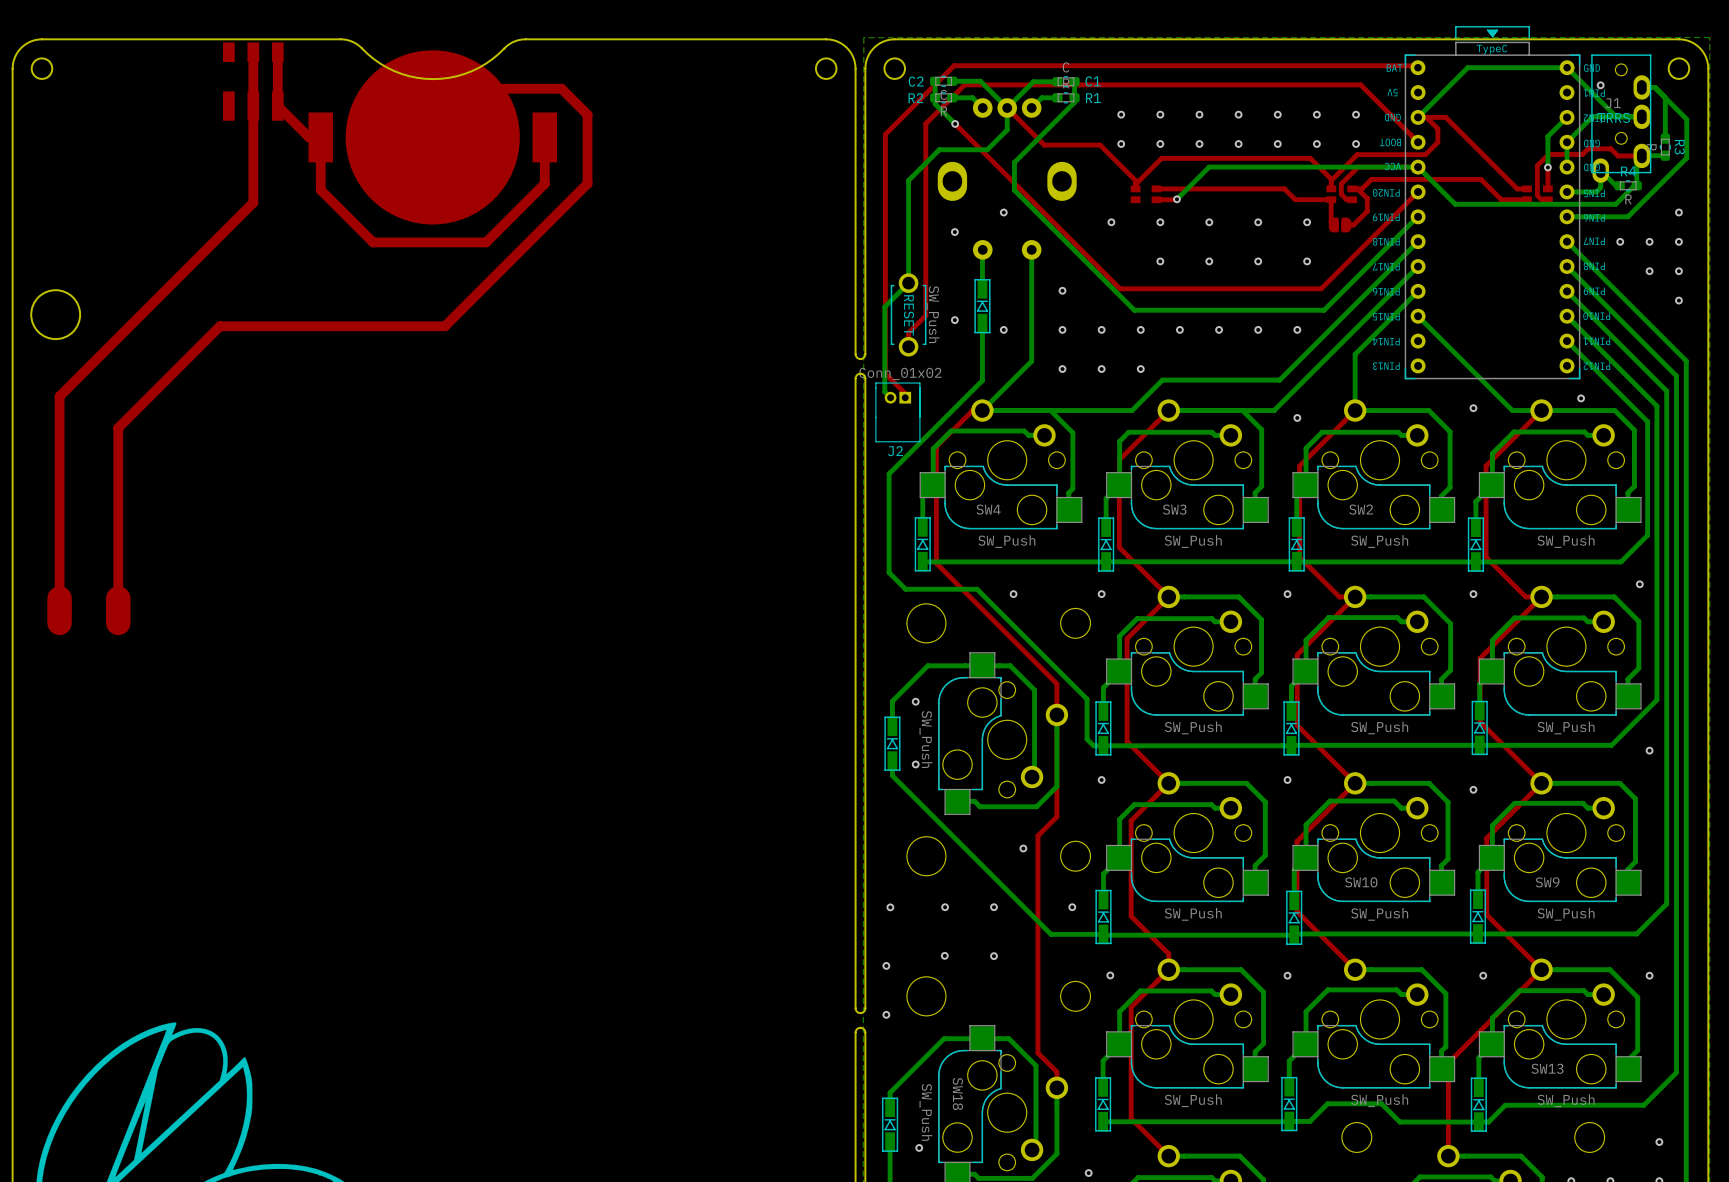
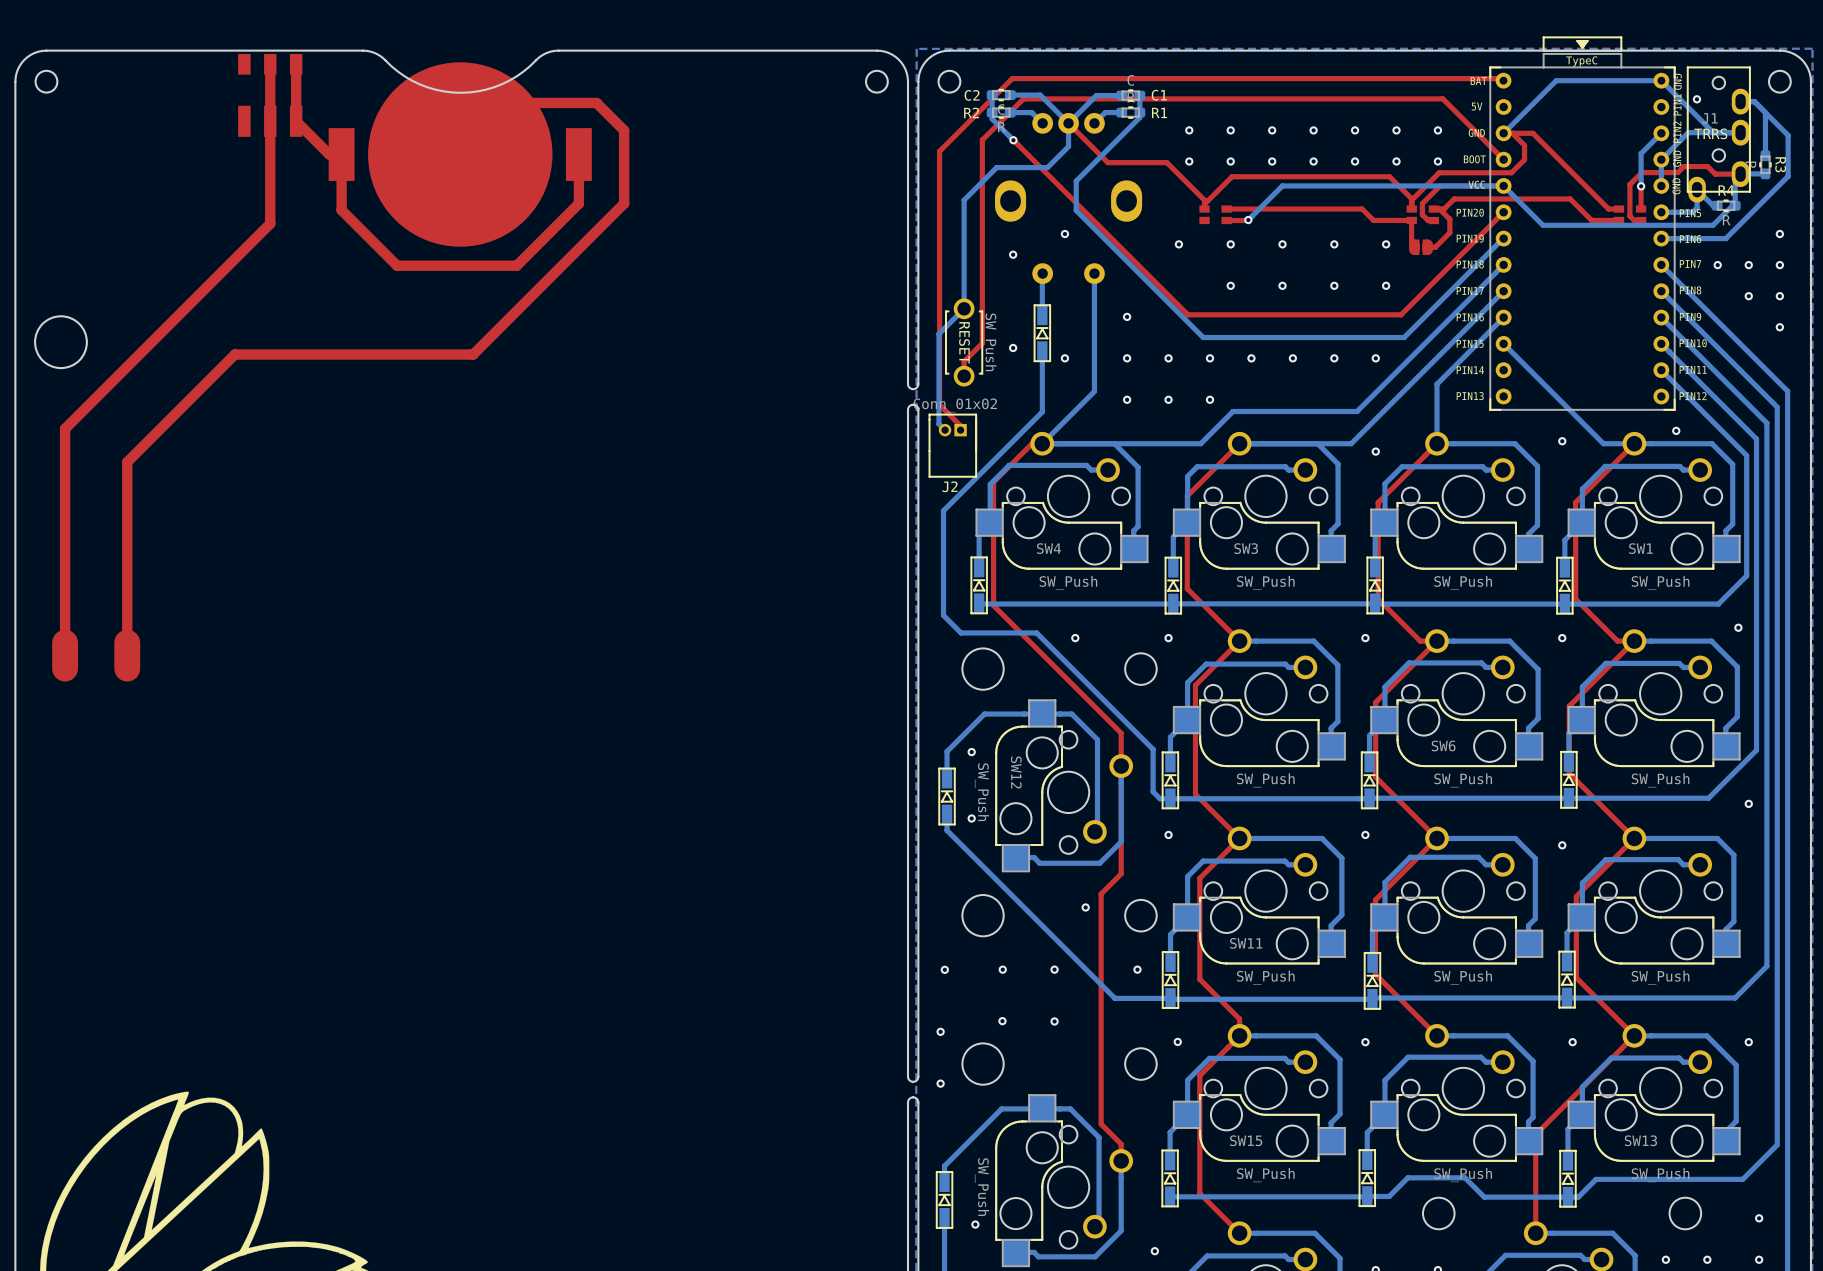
part footprint: [1404, 26, 1581, 380] -> [1489, 36, 1676, 411]
SW2 name: SW2 (1361, 509) -> none
SW1 name: none -> SW1 (1640, 548)
SW6 name: none -> SW6 (1443, 745)
SW12 name: none -> SW12 (1016, 772)
SW11 name: none -> SW11 (1246, 943)
SW10 name: SW10 (1361, 882) -> none
SW9 name: SW9 (1547, 882) -> none
SW15 name: none -> SW15 (1246, 1140)
SW18 name: SW18 (957, 1093) -> none

